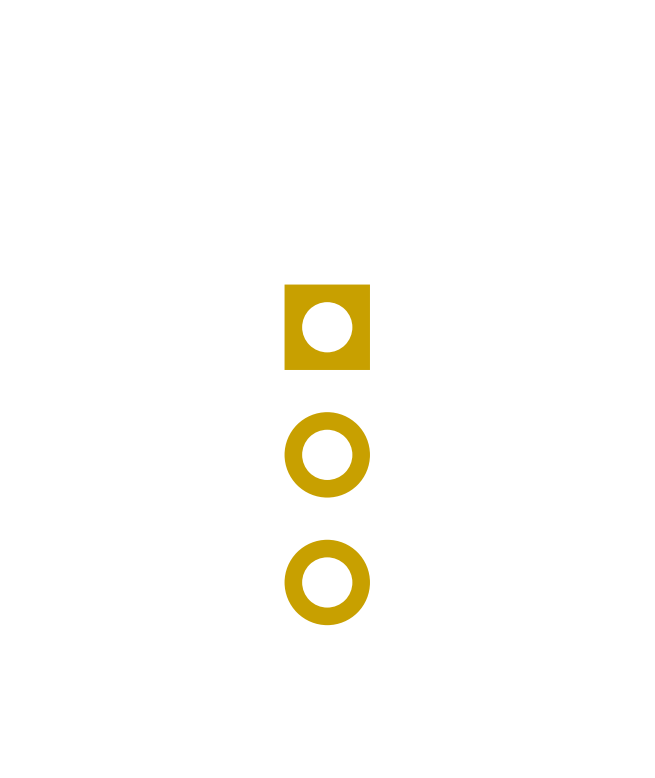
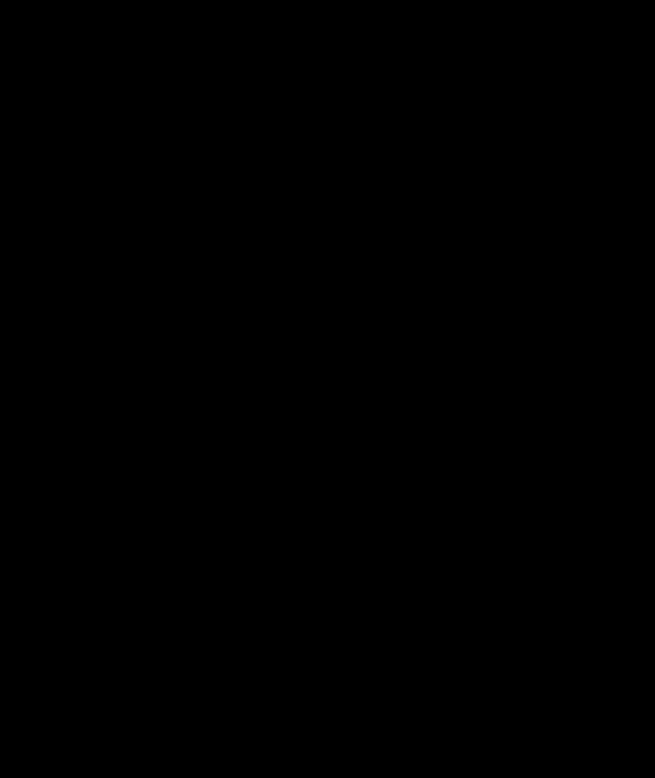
part: (327, 454) -> none

